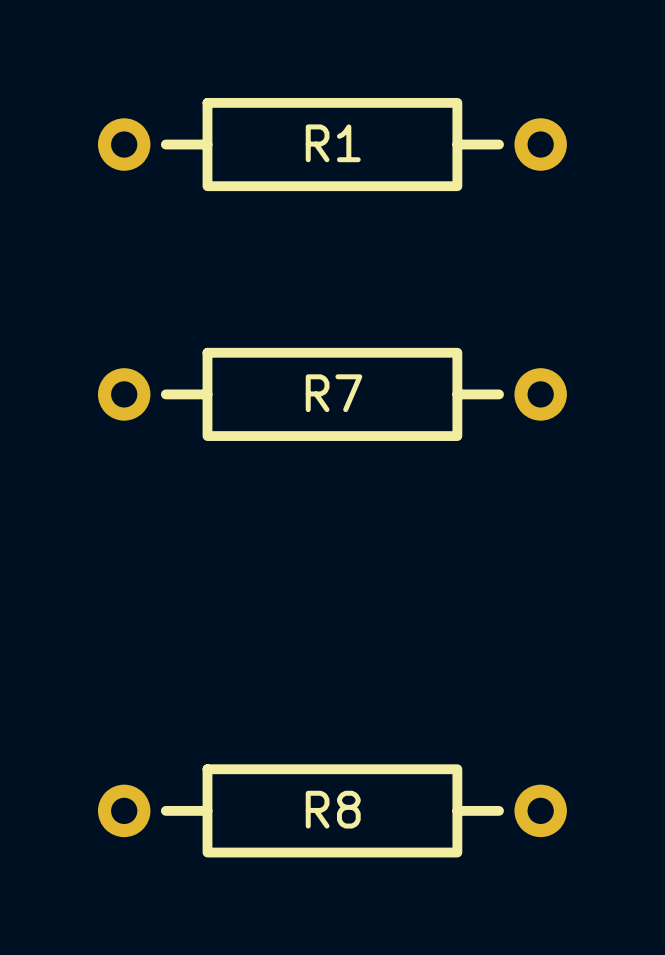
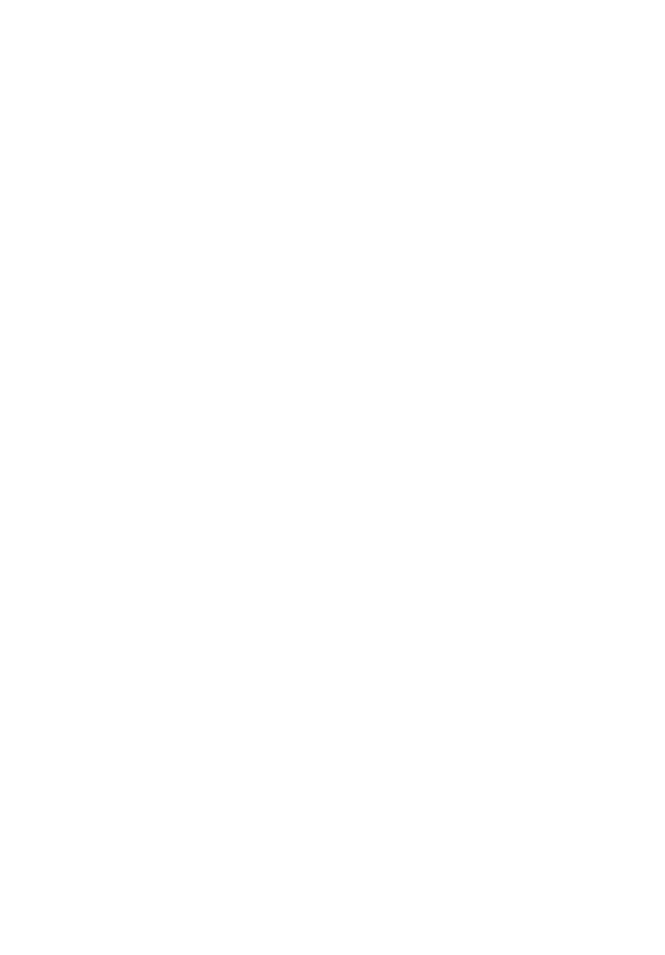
R1: (332, 144) -> none
R7: (332, 394) -> none
R8: (332, 810) -> none

